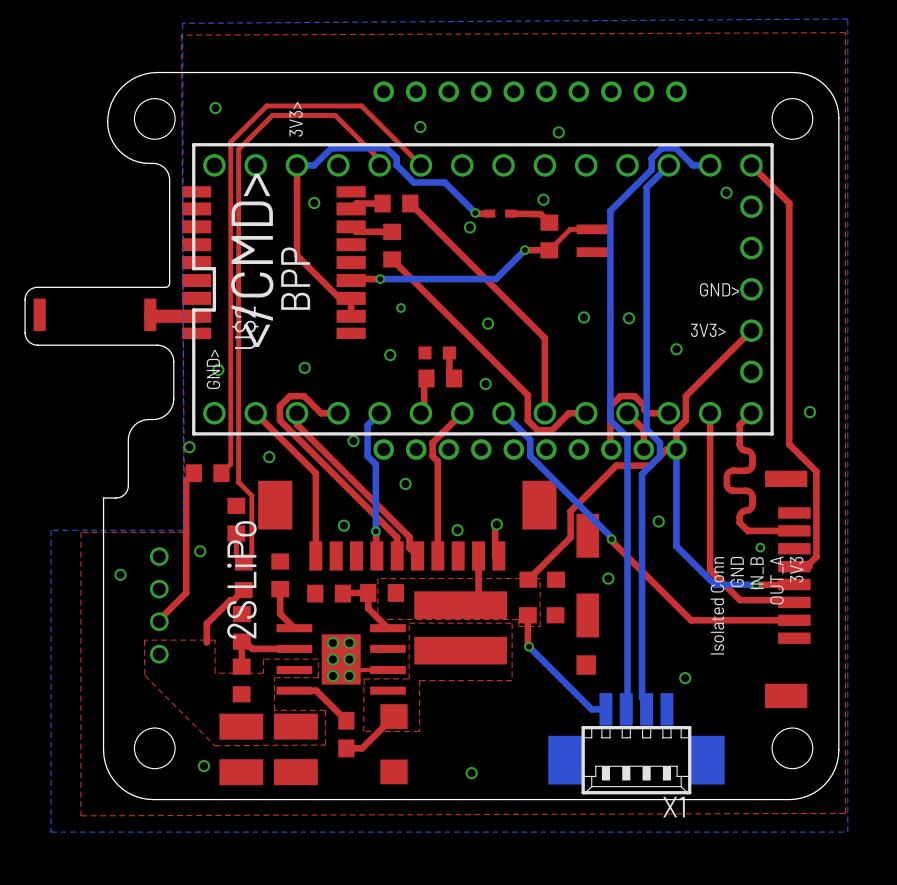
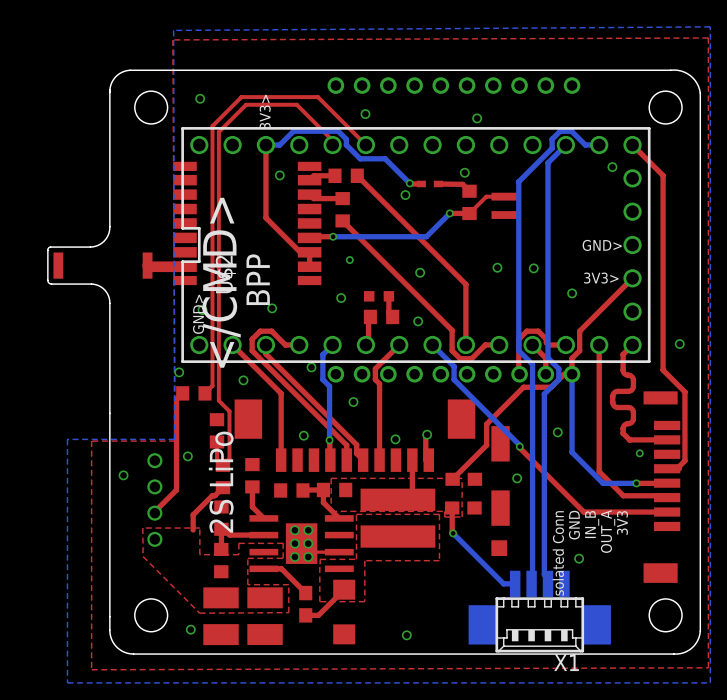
board edge: none -> (109, 90) (108, 234) (104, 240) (95, 246) (50, 247) (47, 250) (49, 283) (93, 284) (102, 288) (108, 296) (109, 413)
board edge: none -> (109, 92) (111, 84) (115, 77) (122, 72) (130, 70) (674, 70) (684, 72) (692, 77) (700, 93) (700, 631) (694, 645) (686, 651) (677, 654) (133, 654) (124, 652) (116, 647) (111, 639) (109, 630)
text position: </CMD> (252, 260) -> </CMD> (221, 282)
text position: BPP (295, 278) -> BPP (258, 279)
board edge: (103, 498) (119, 497) (127, 490) (128, 437) (132, 427) (141, 421) (163, 416) (172, 406) (173, 398) (172, 355) (167, 348) (159, 345) (32, 344) (27, 340) (25, 334) (25, 298) (28, 290) (35, 287) (165, 287) (169, 284) (168, 173) (159, 164) (138, 162) (123, 154) (113, 142) (108, 127) (109, 109) (114, 97) (122, 87) (132, 79) (144, 74) (157, 72) (793, 72) (805, 74) (816, 78) (825, 85) (832, 95) (837, 106) (838, 117) (838, 750) (835, 768) (824, 785) (808, 795) (789, 799) (153, 799) (134, 795) (118, 785) (107, 768) (103, 750) -> (109, 630) (109, 616)
text position: 3V3 (796, 569) -> 3V3 (622, 522)
text position: GND (737, 571) -> GND (574, 525)
text position: IN_B (757, 573) -> IN_B (592, 524)
text position: OUT_A (776, 580) -> OUT_A (608, 531)
text position: Isolated Conn (717, 605) -> Isolated Conn (558, 555)

